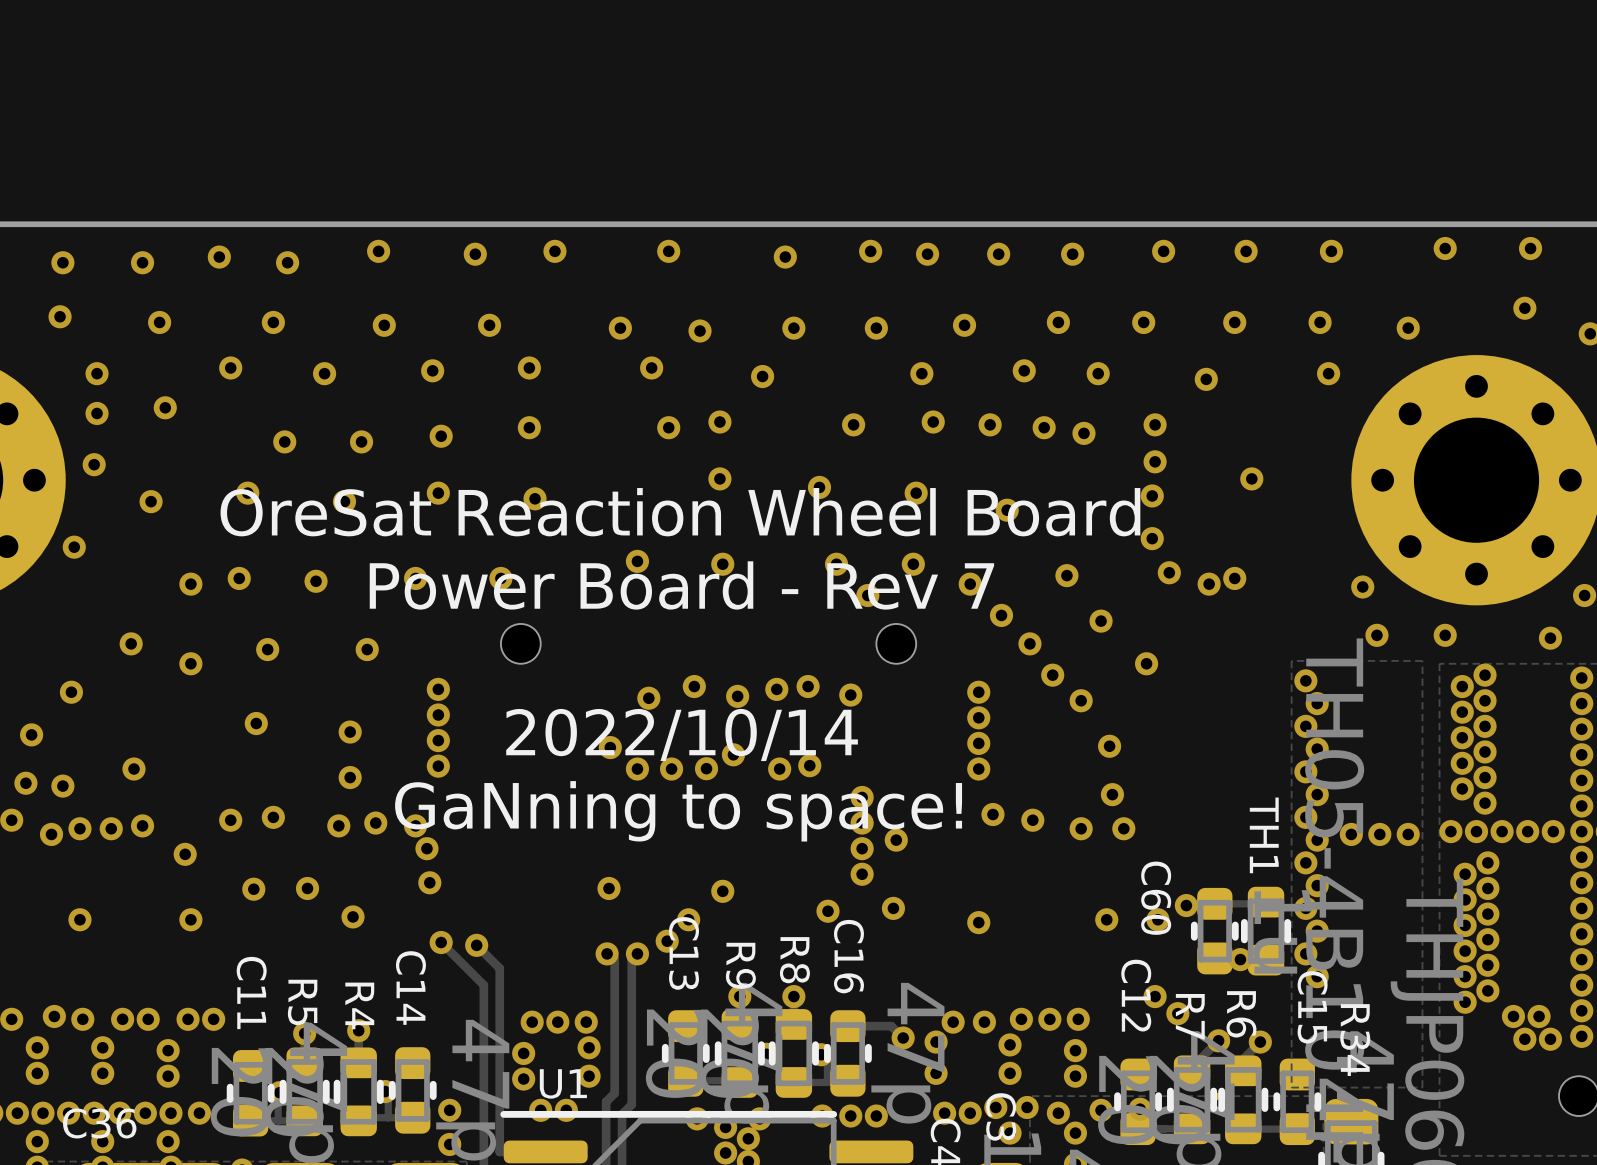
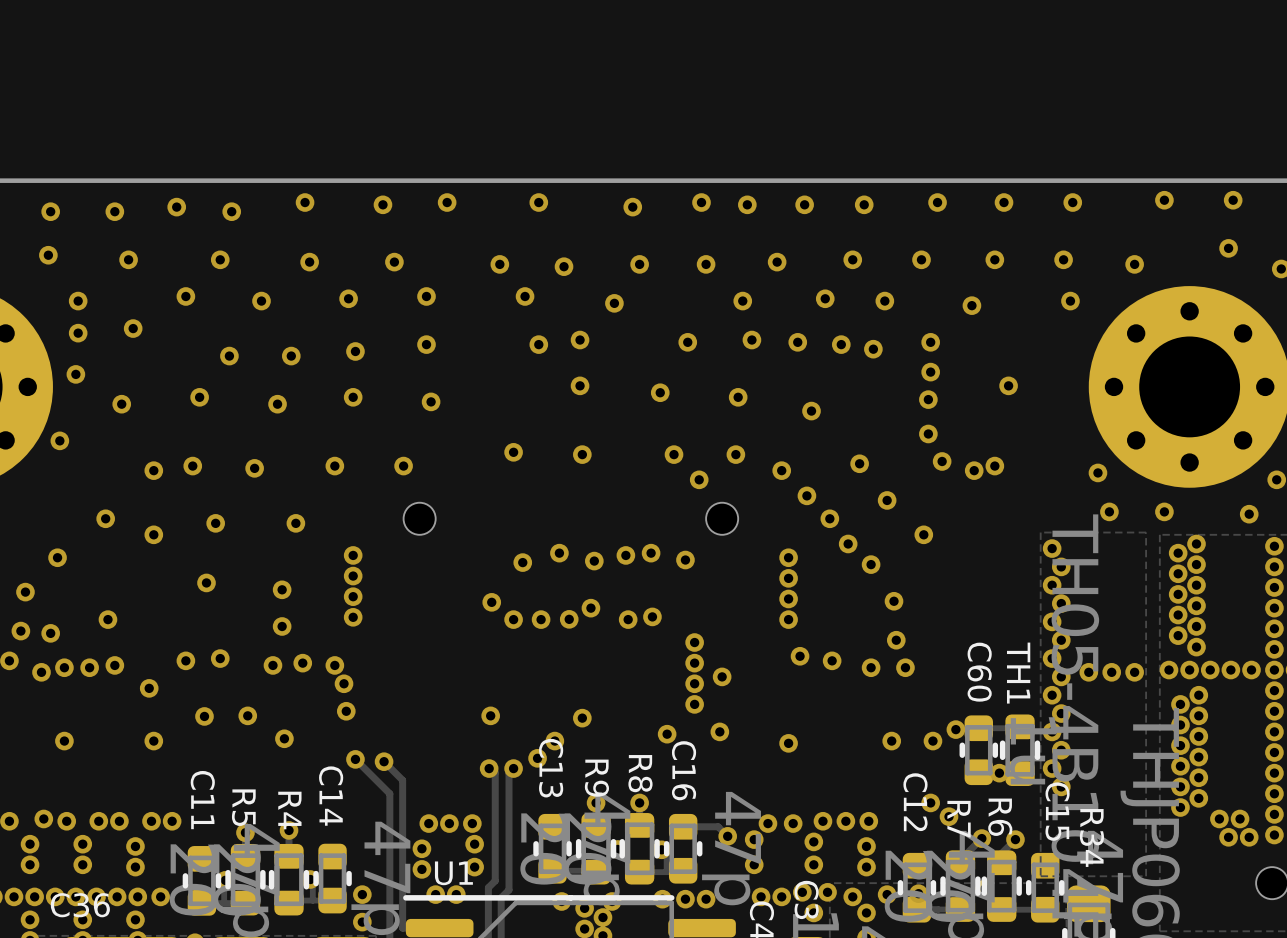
text: OreSat Reaction Wheel Board (680, 512) -> none
text: Power Board - Rev 7 (681, 585) -> none
text: 2022/10/14 (682, 734) -> none
text: GaNning to space! (678, 811) -> none
C60 name position: C60 (1156, 898) -> C60 (979, 672)

